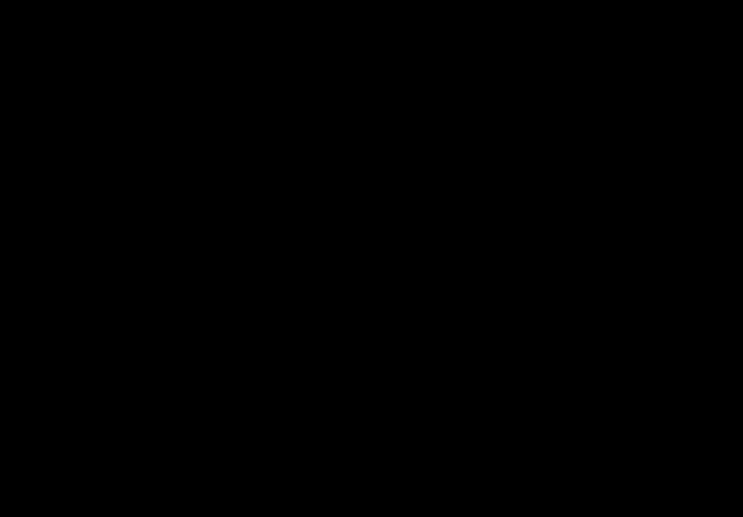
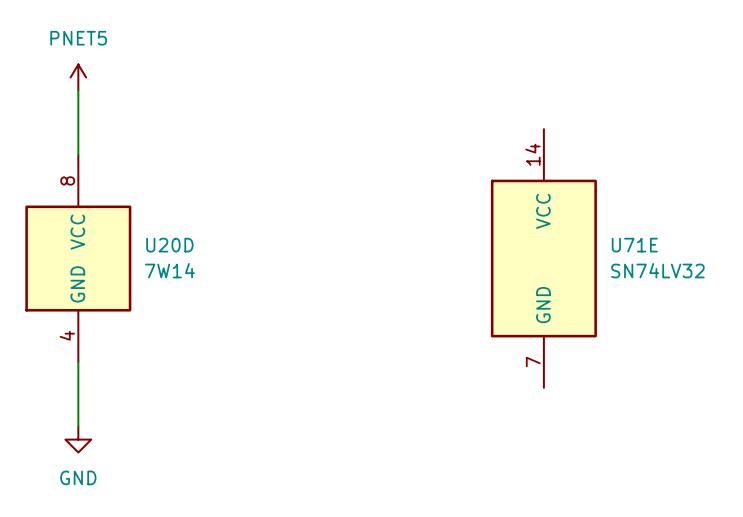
power symbol: none -> PNET5 (78, 77)
wire: none -> (78, 90) (78, 155)
U20D: none -> 7W14 (78, 258)
U71E: none -> SN74LV32 (543, 258)
wire: none -> (78, 362) (78, 426)
power symbol: none -> GND (78, 439)

